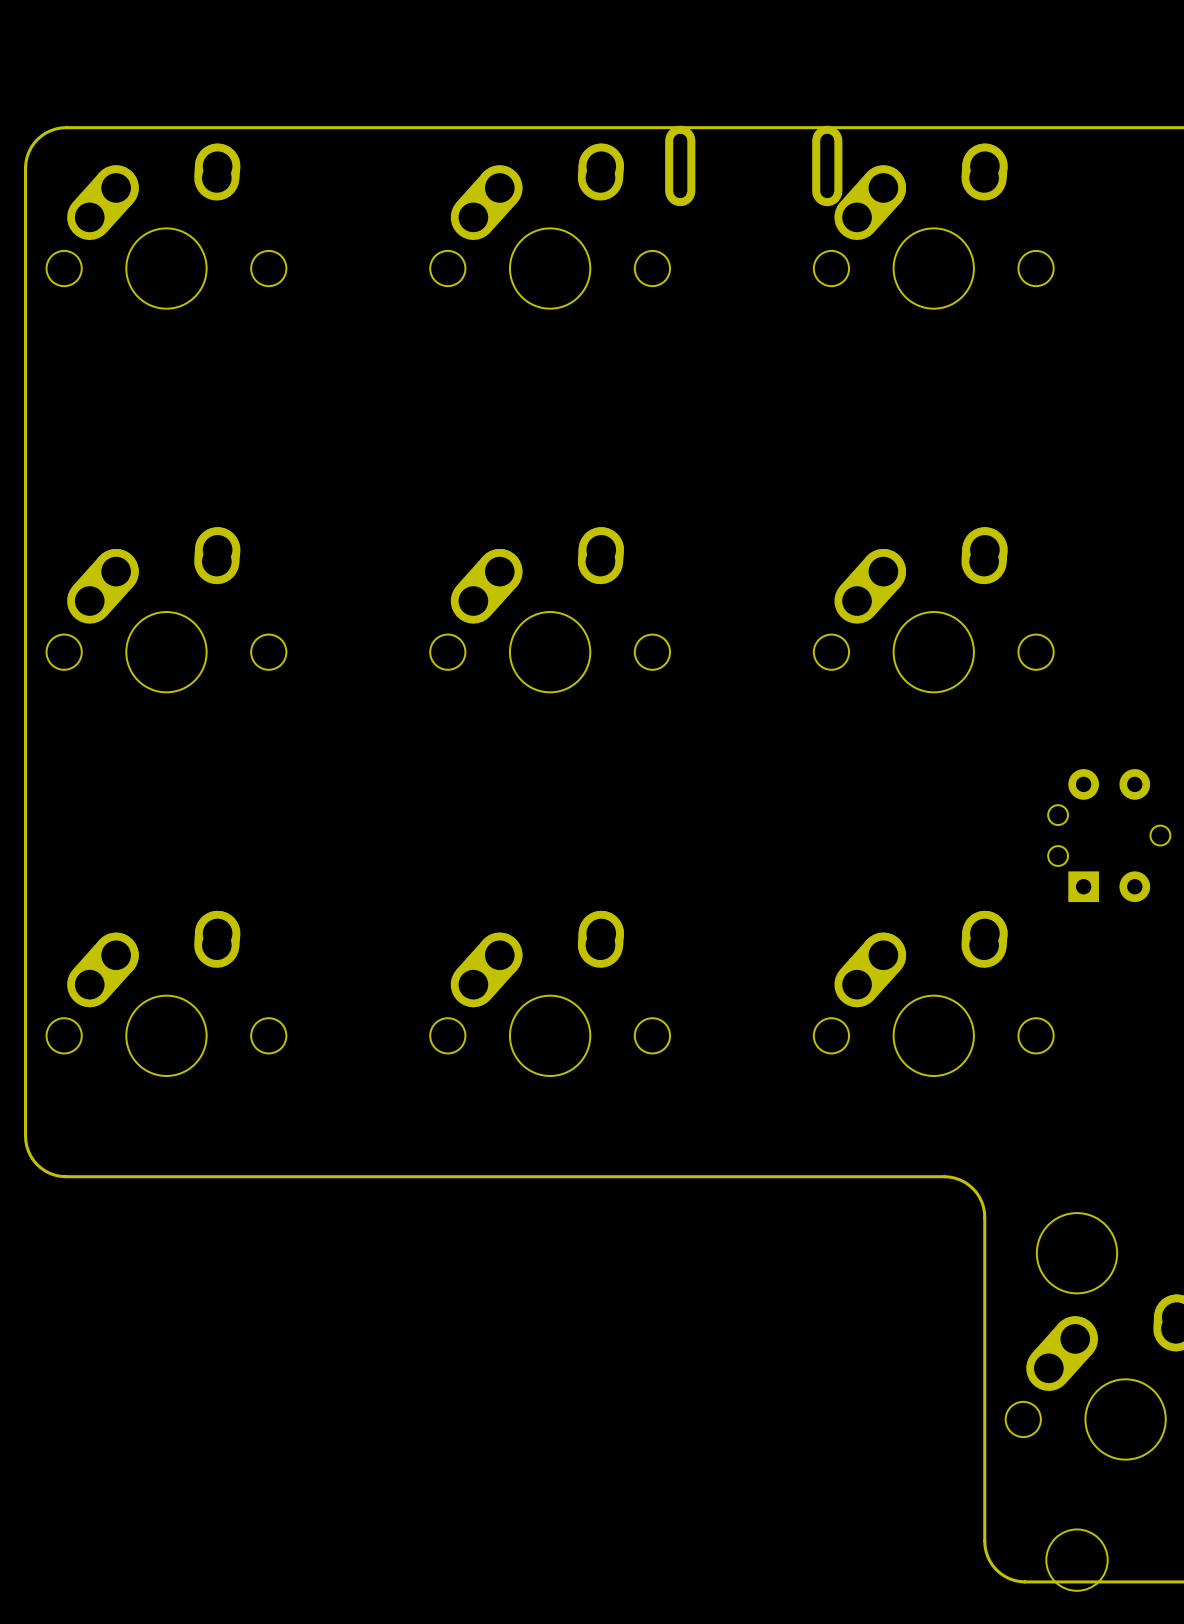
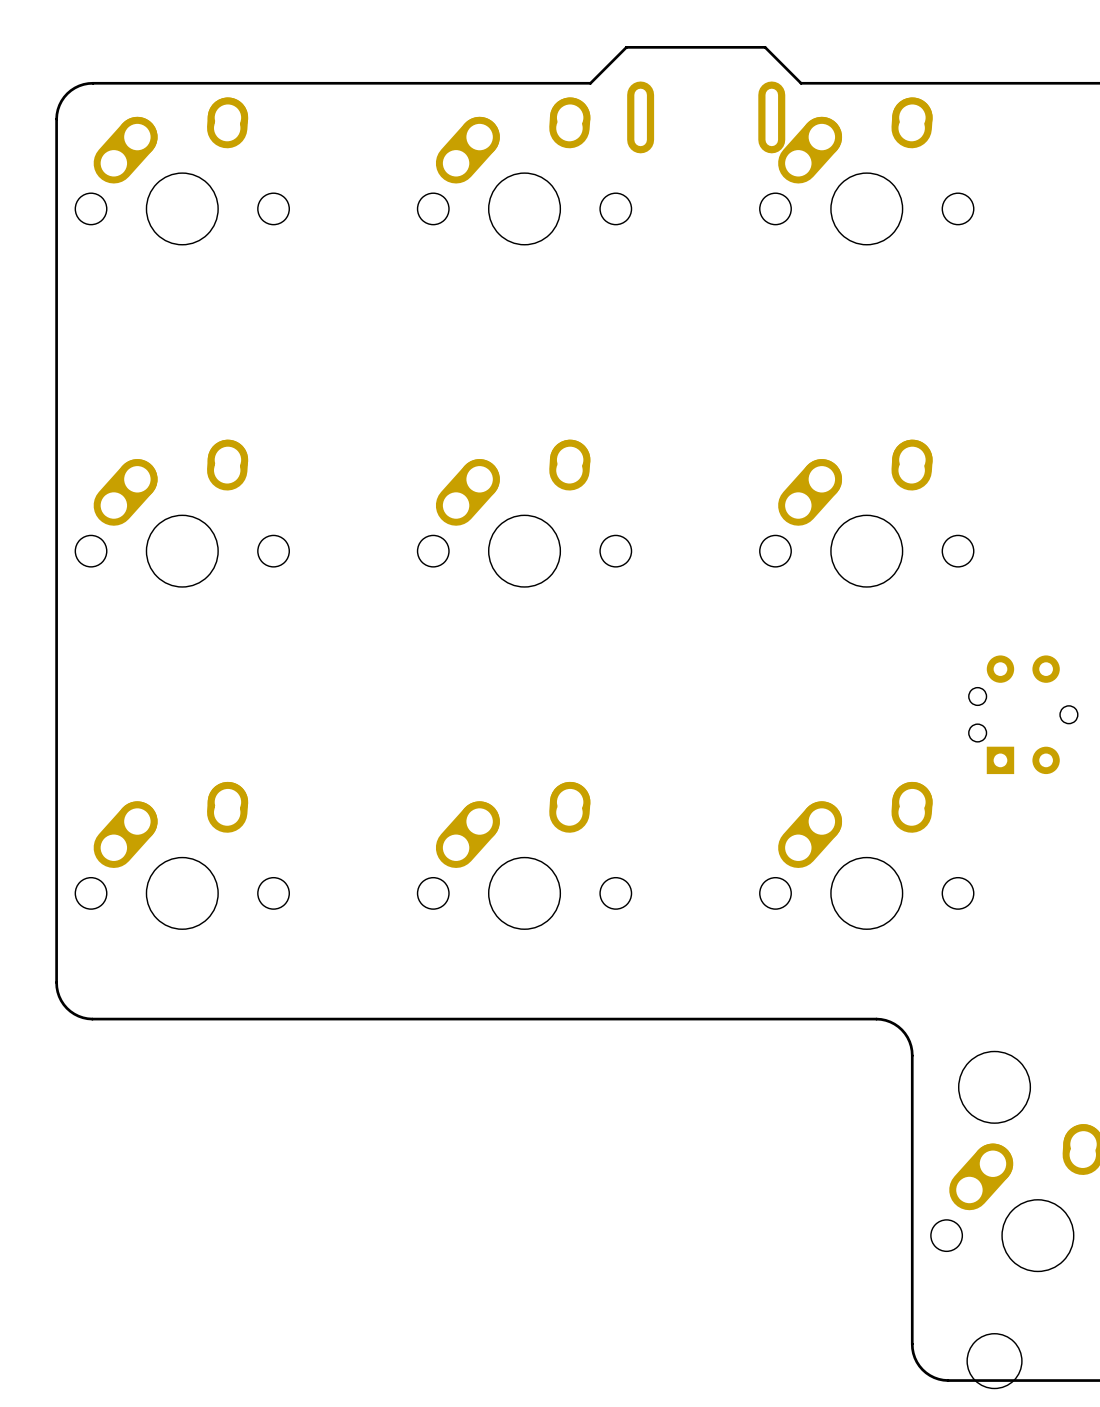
board edge: (624, 127) (860, 127) -> (590, 83) (626, 47) (765, 47) (801, 83)

